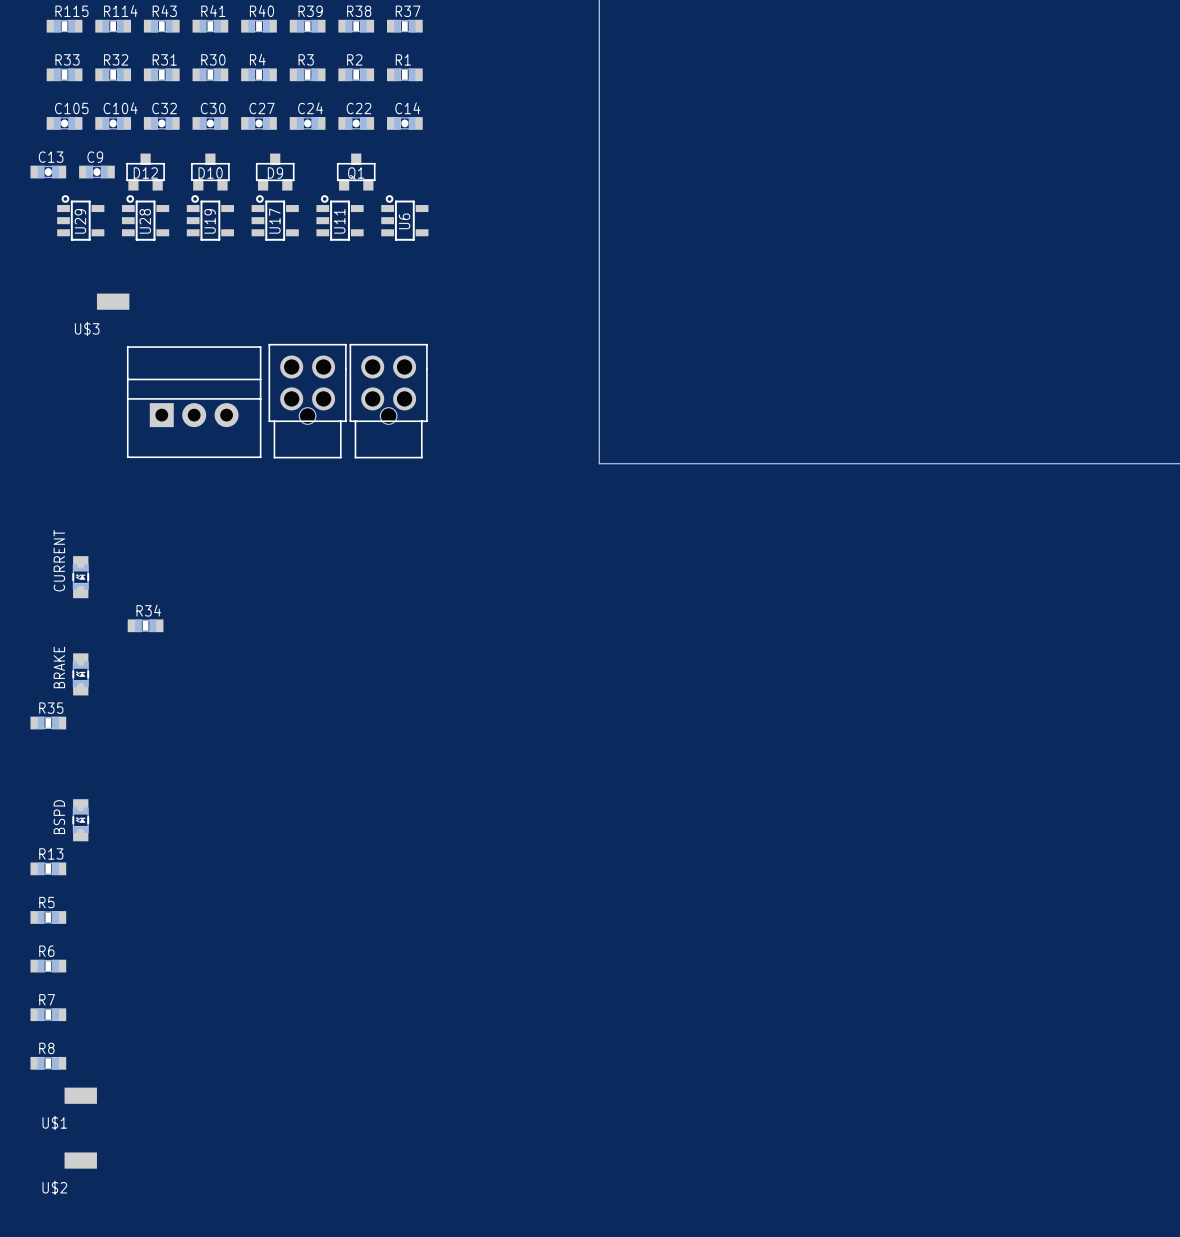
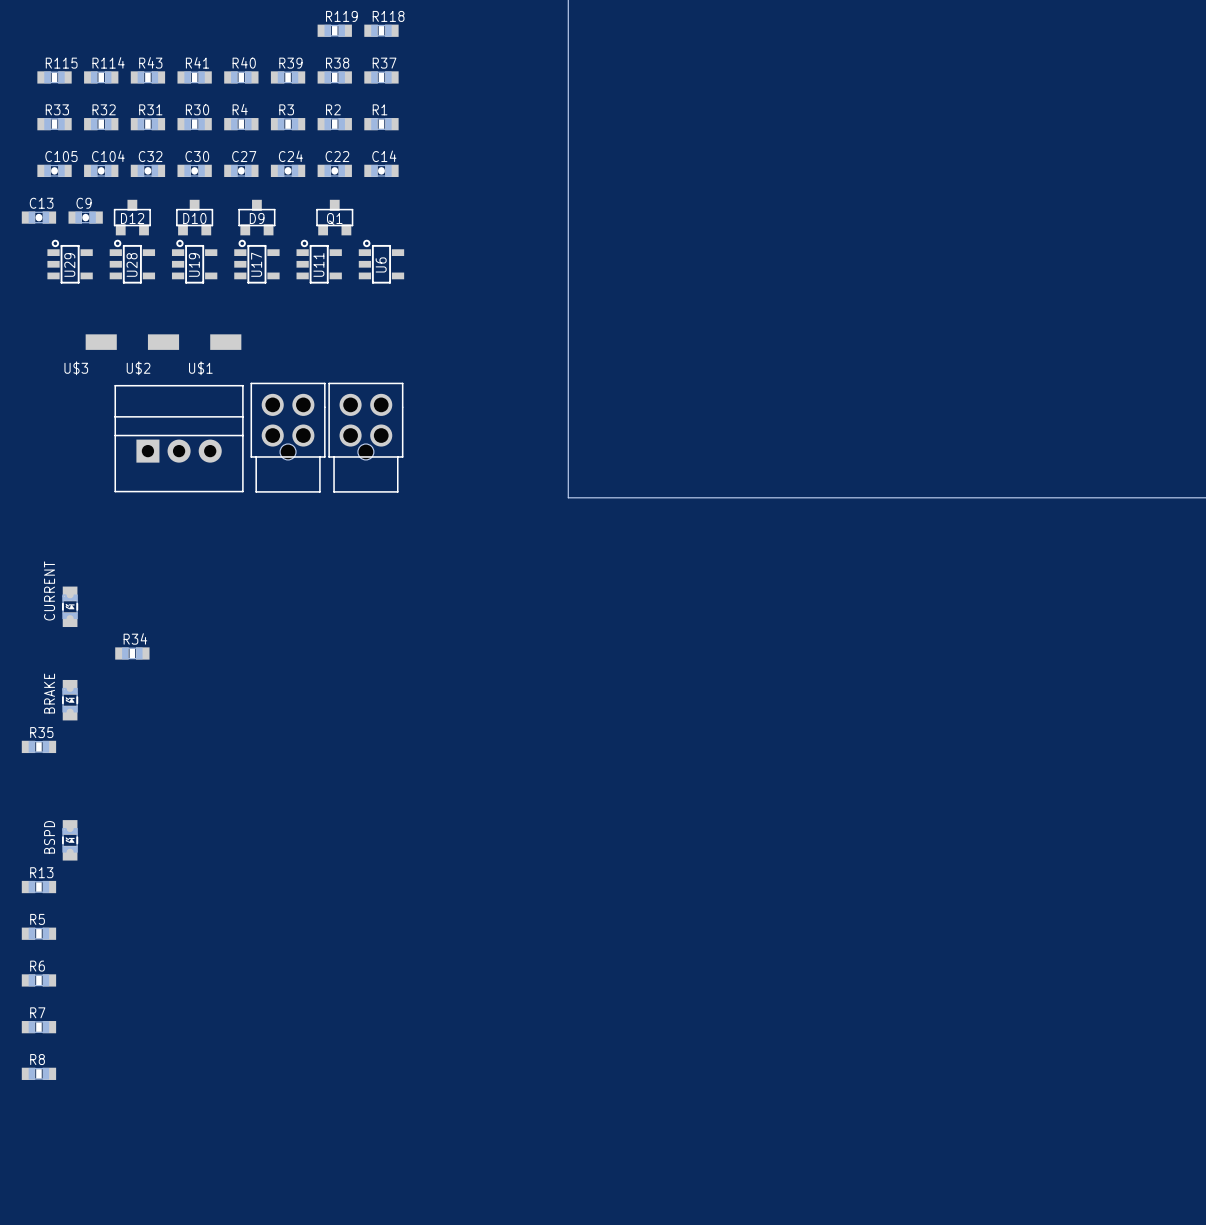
U$1 position: (80, 1095) -> (225, 342)
U$2 position: (80, 1160) -> (163, 342)

